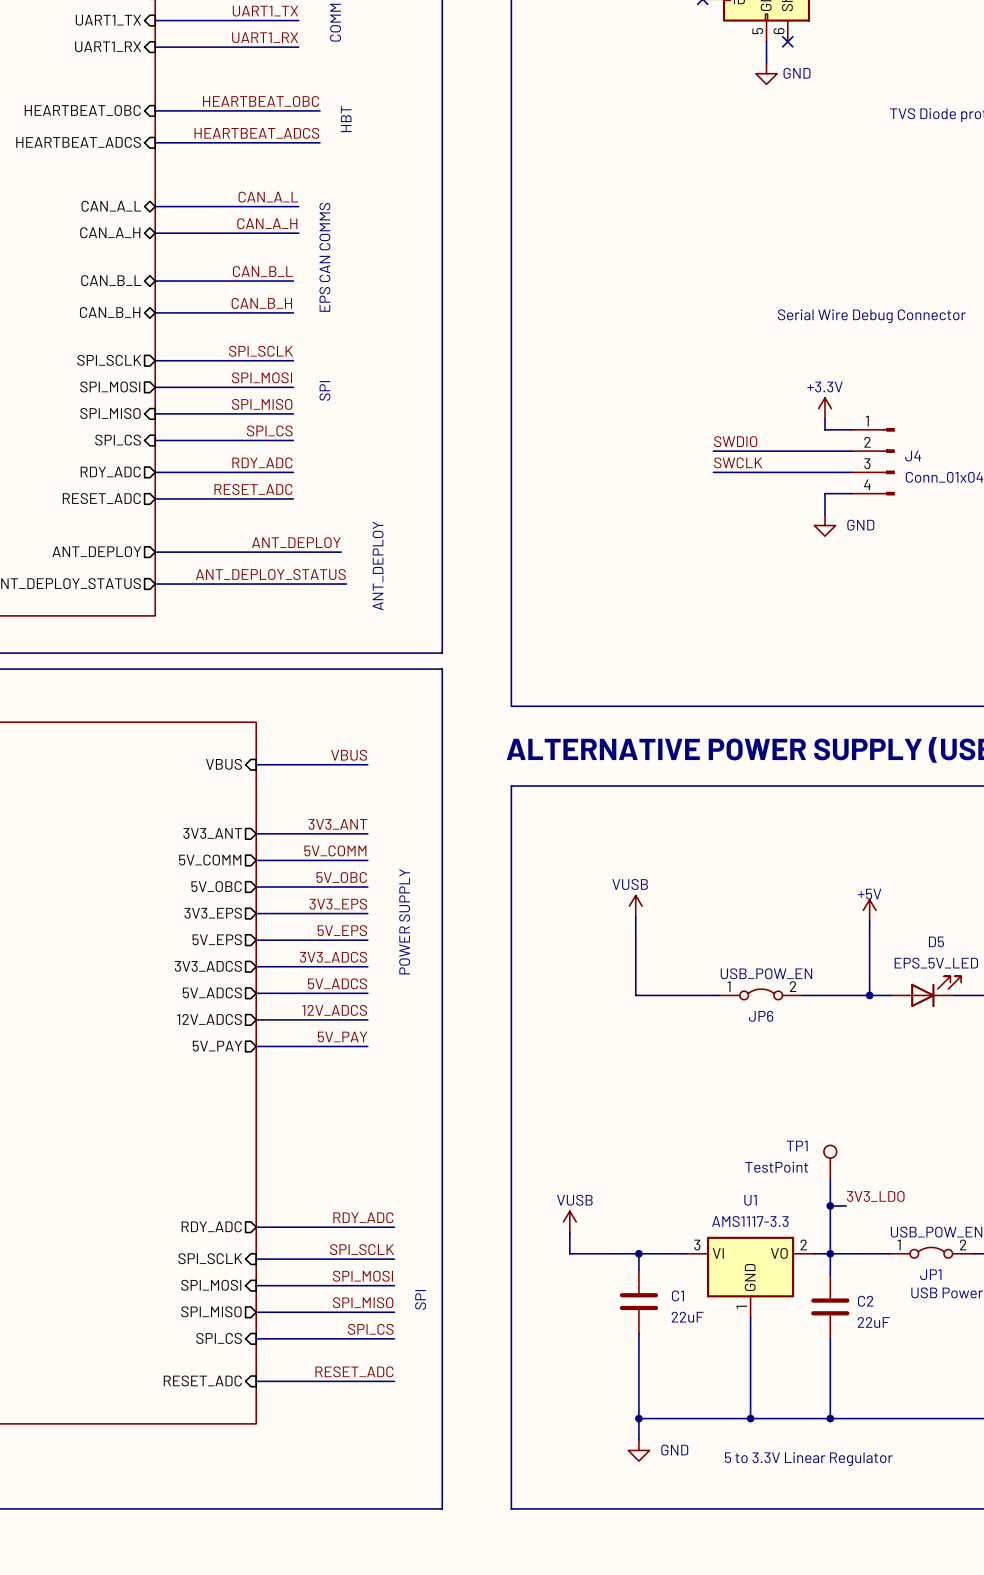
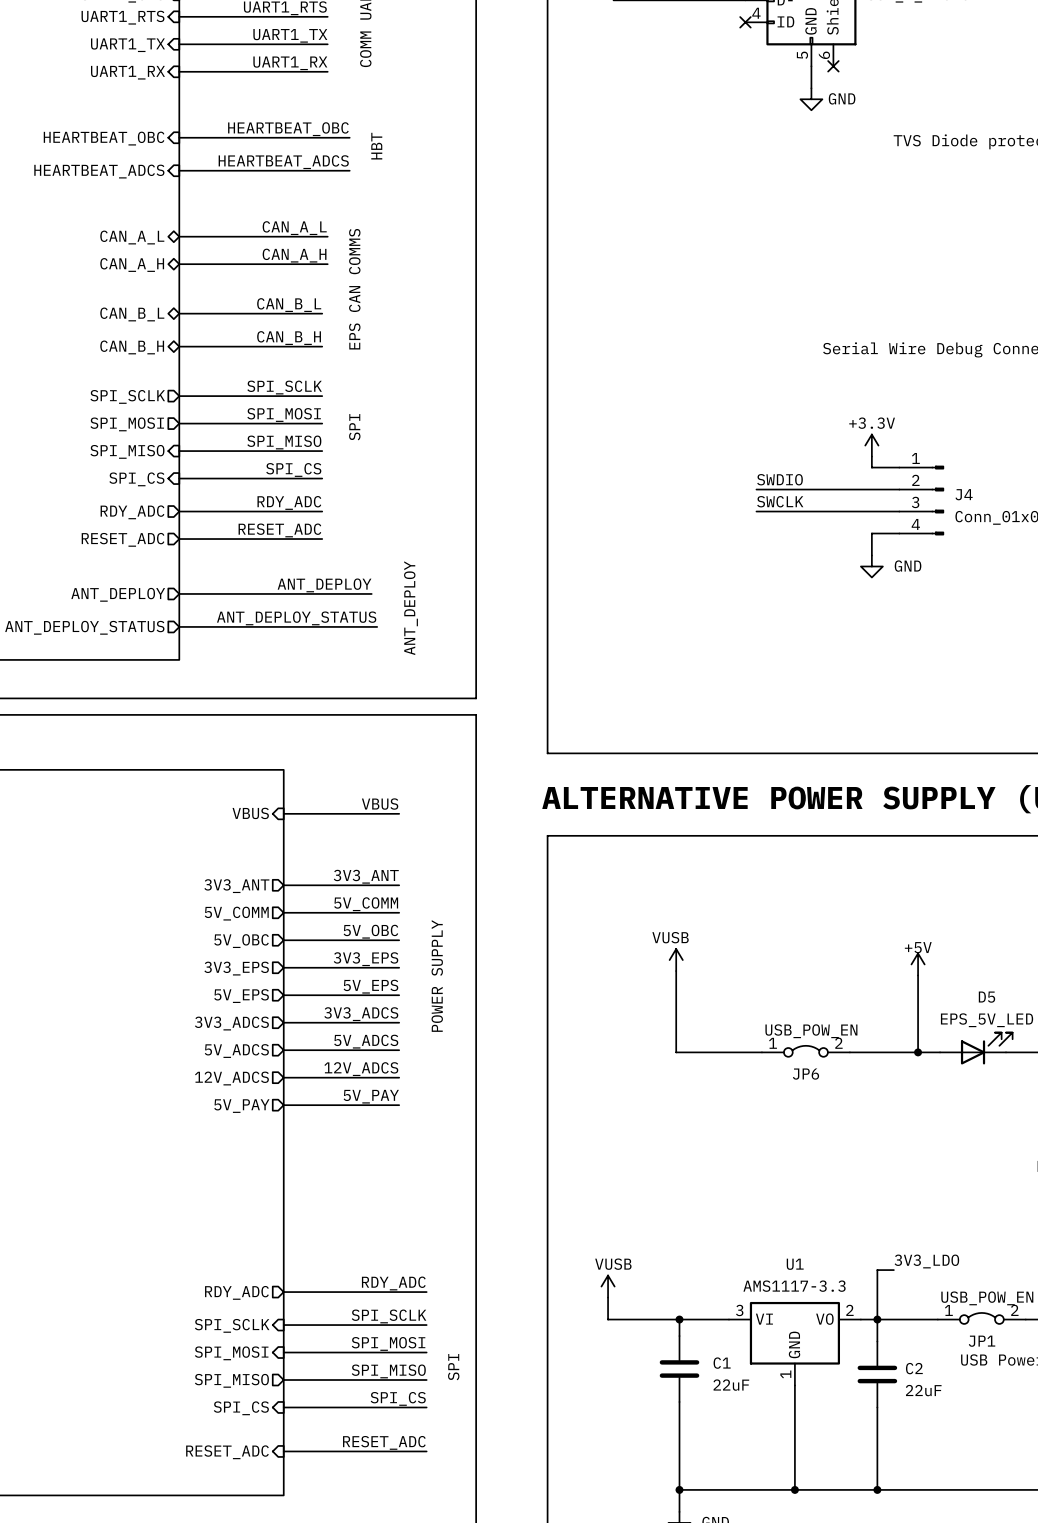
TP1: TestPoint (830, 1162) -> none
wire: (830, 1179) (830, 1205) -> none
junction: (830, 1205) -> none

